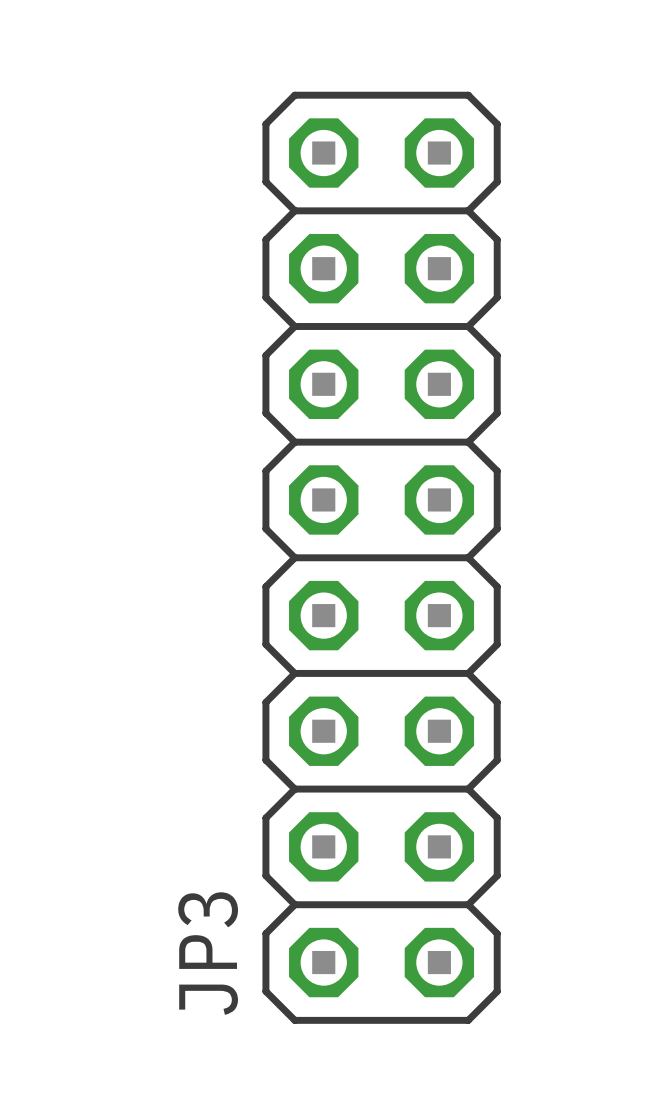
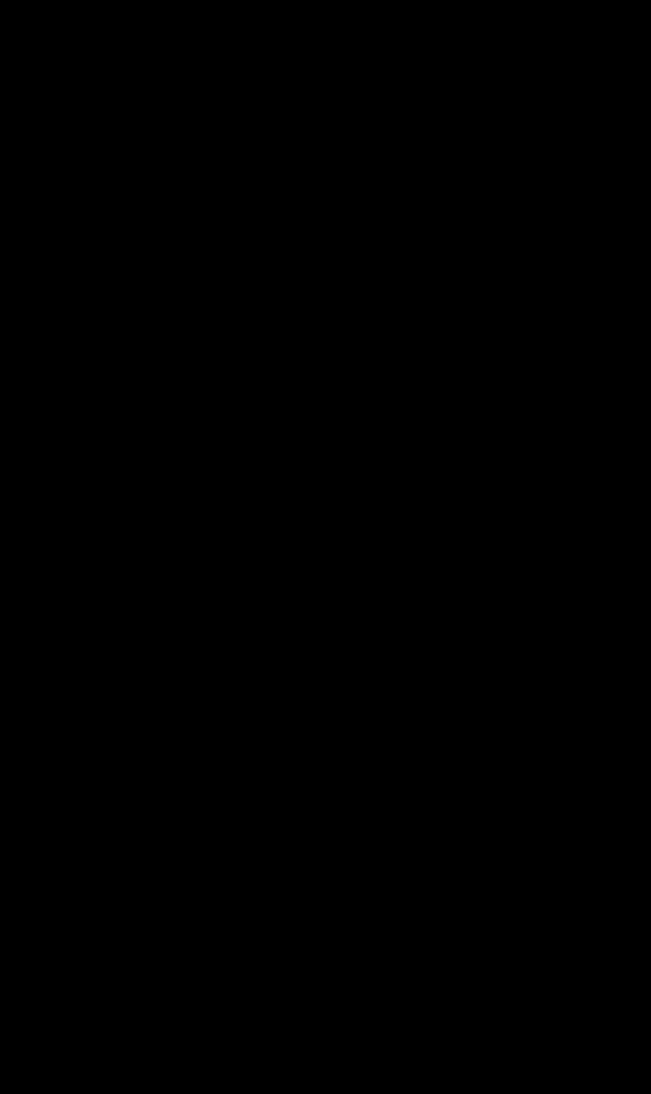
JP3: (381, 557) -> none

